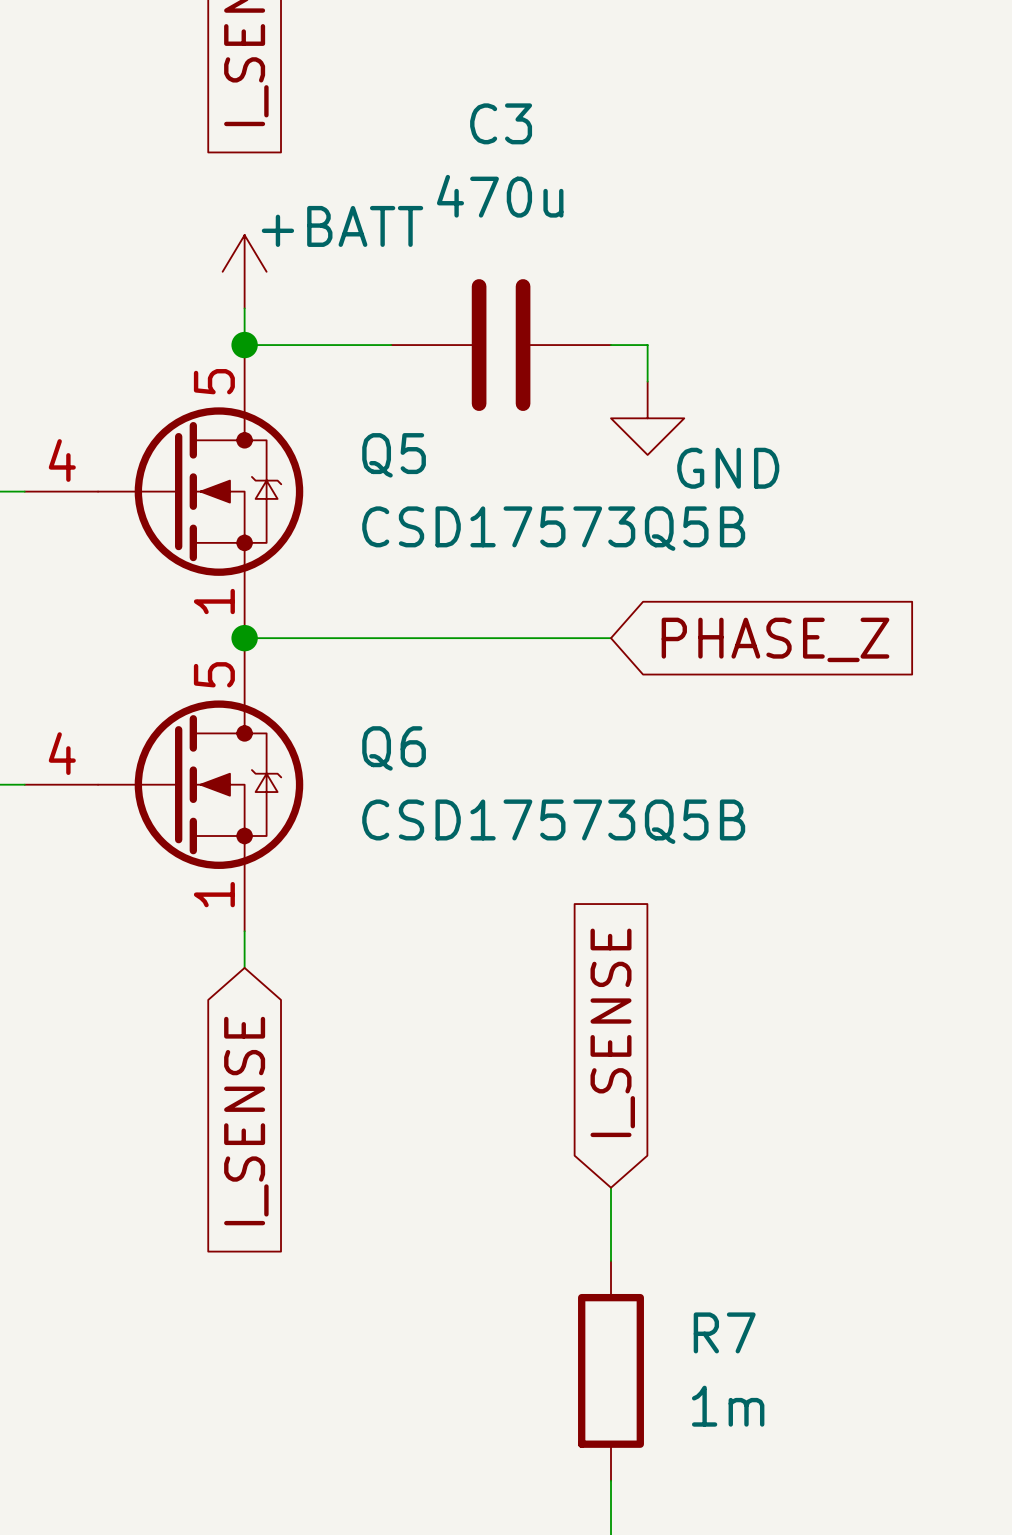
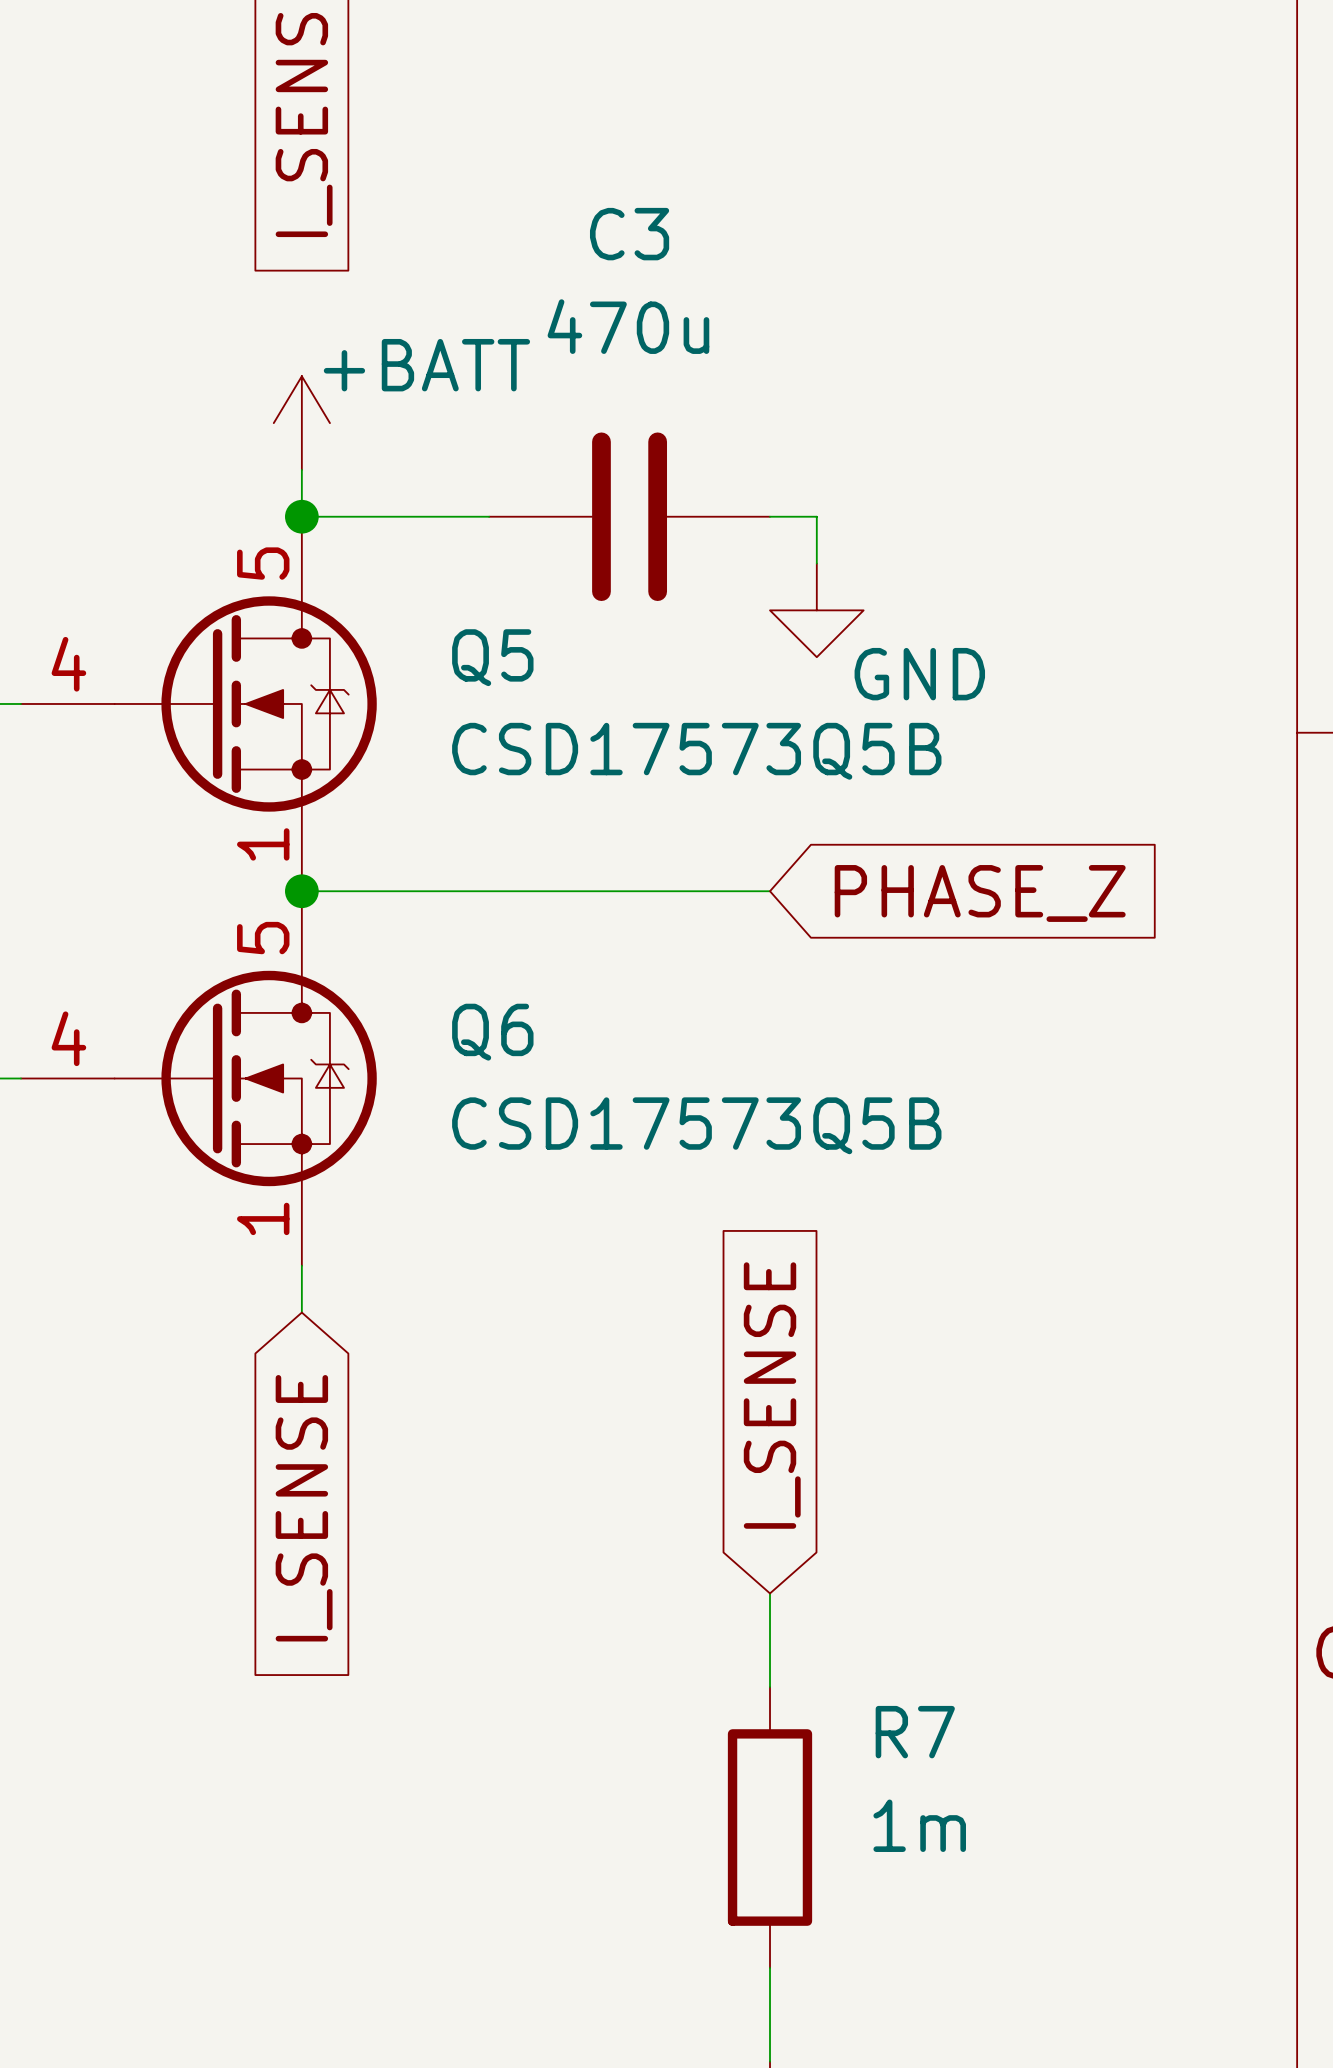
R7 name position: R7 (724, 1332) -> R7 (915, 1732)
R7 value position: 1m (728, 1406) -> 1m (919, 1825)

